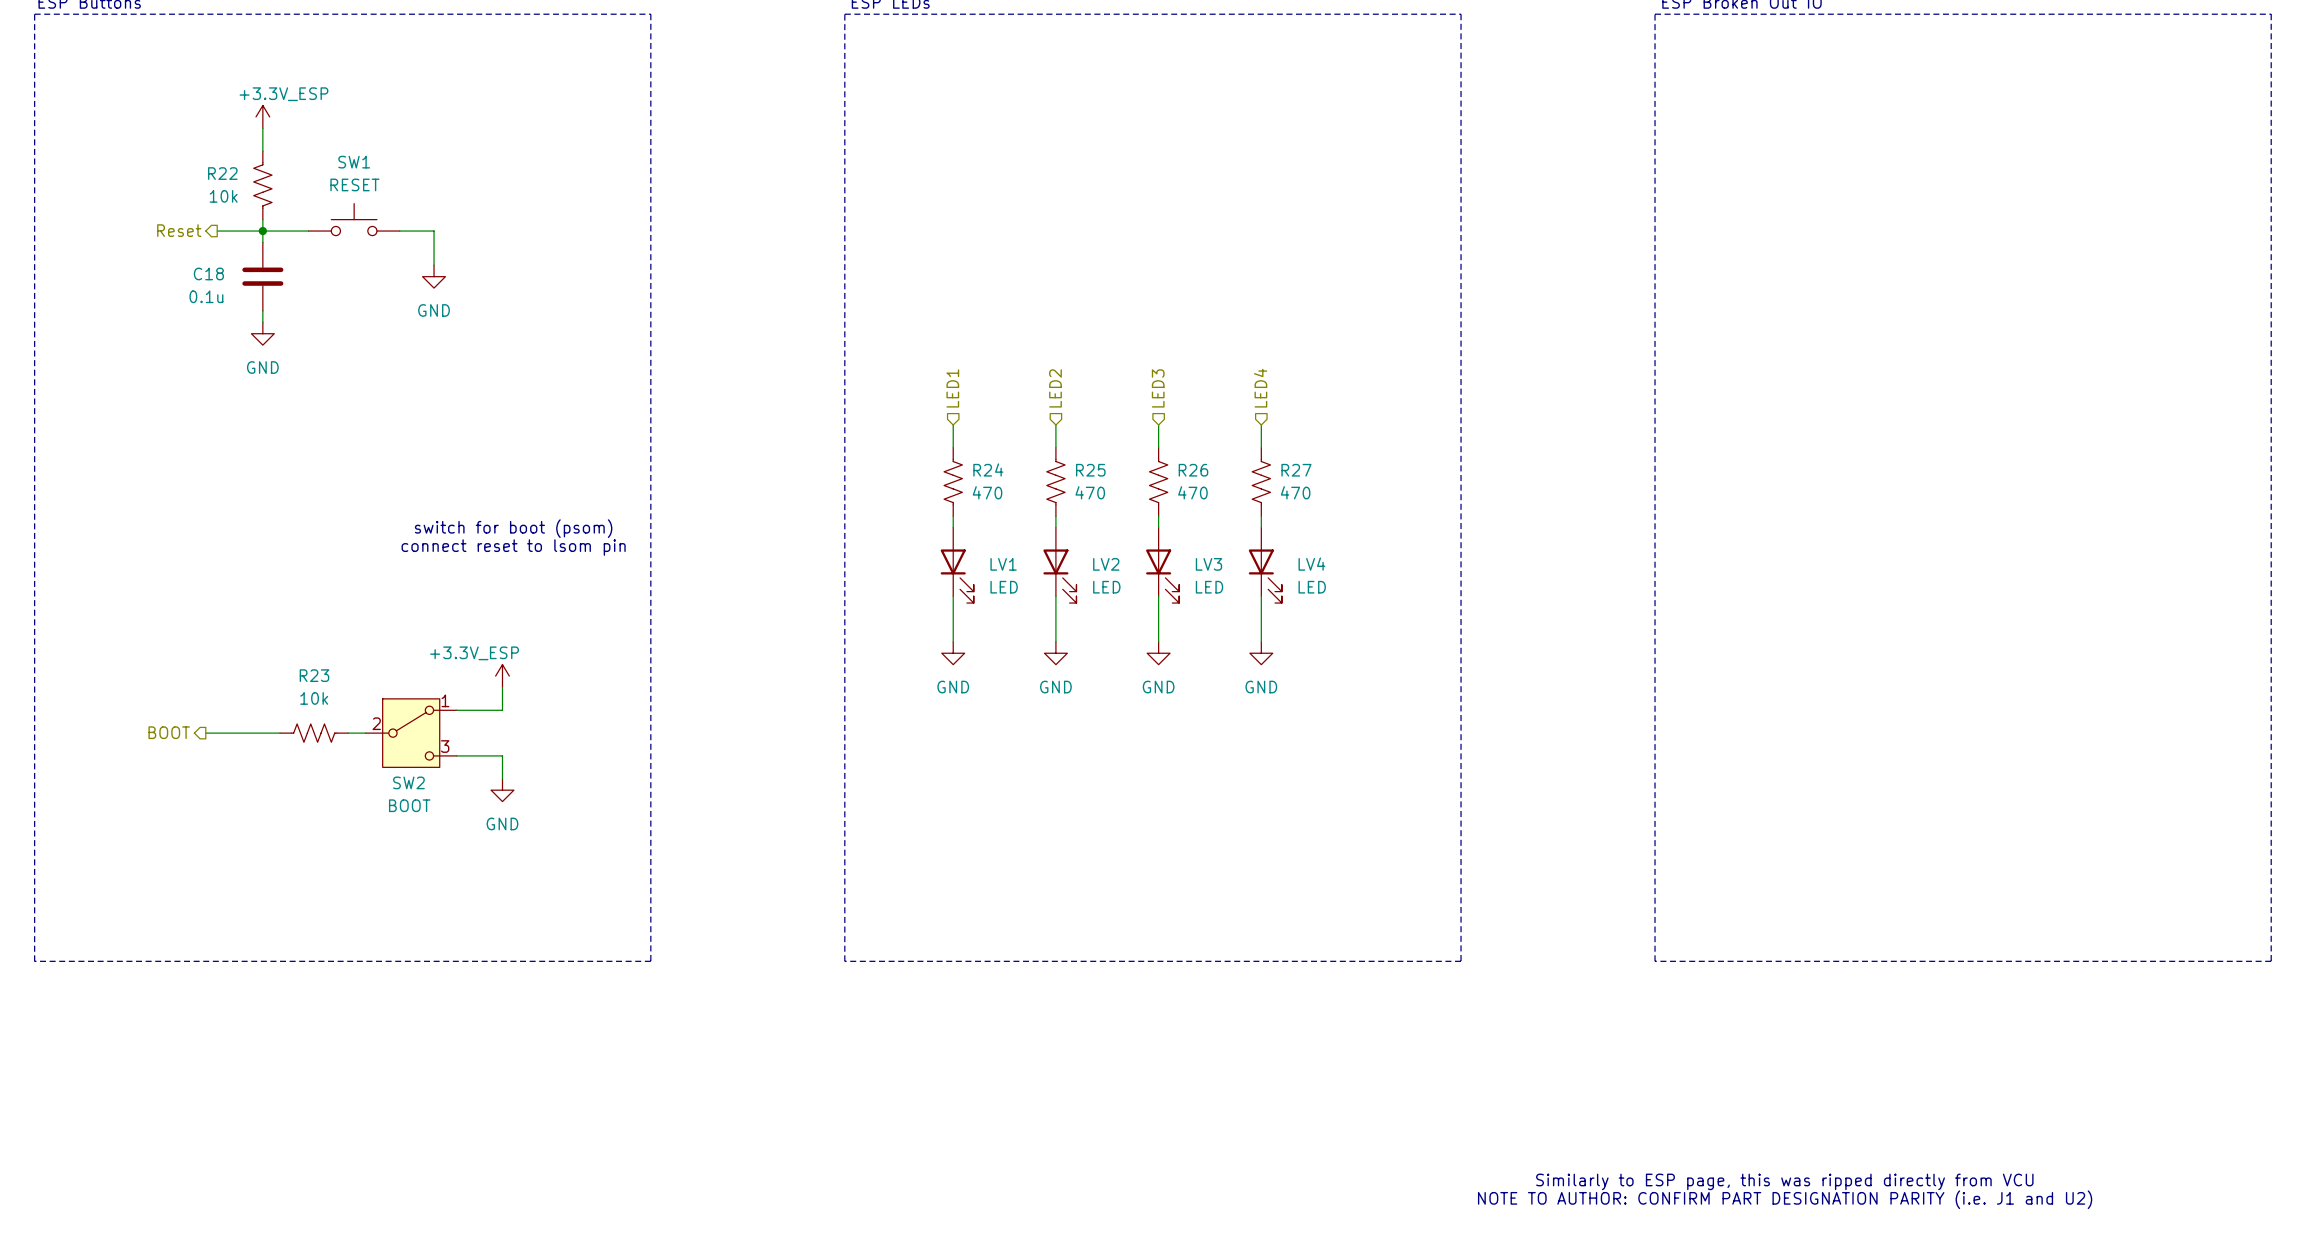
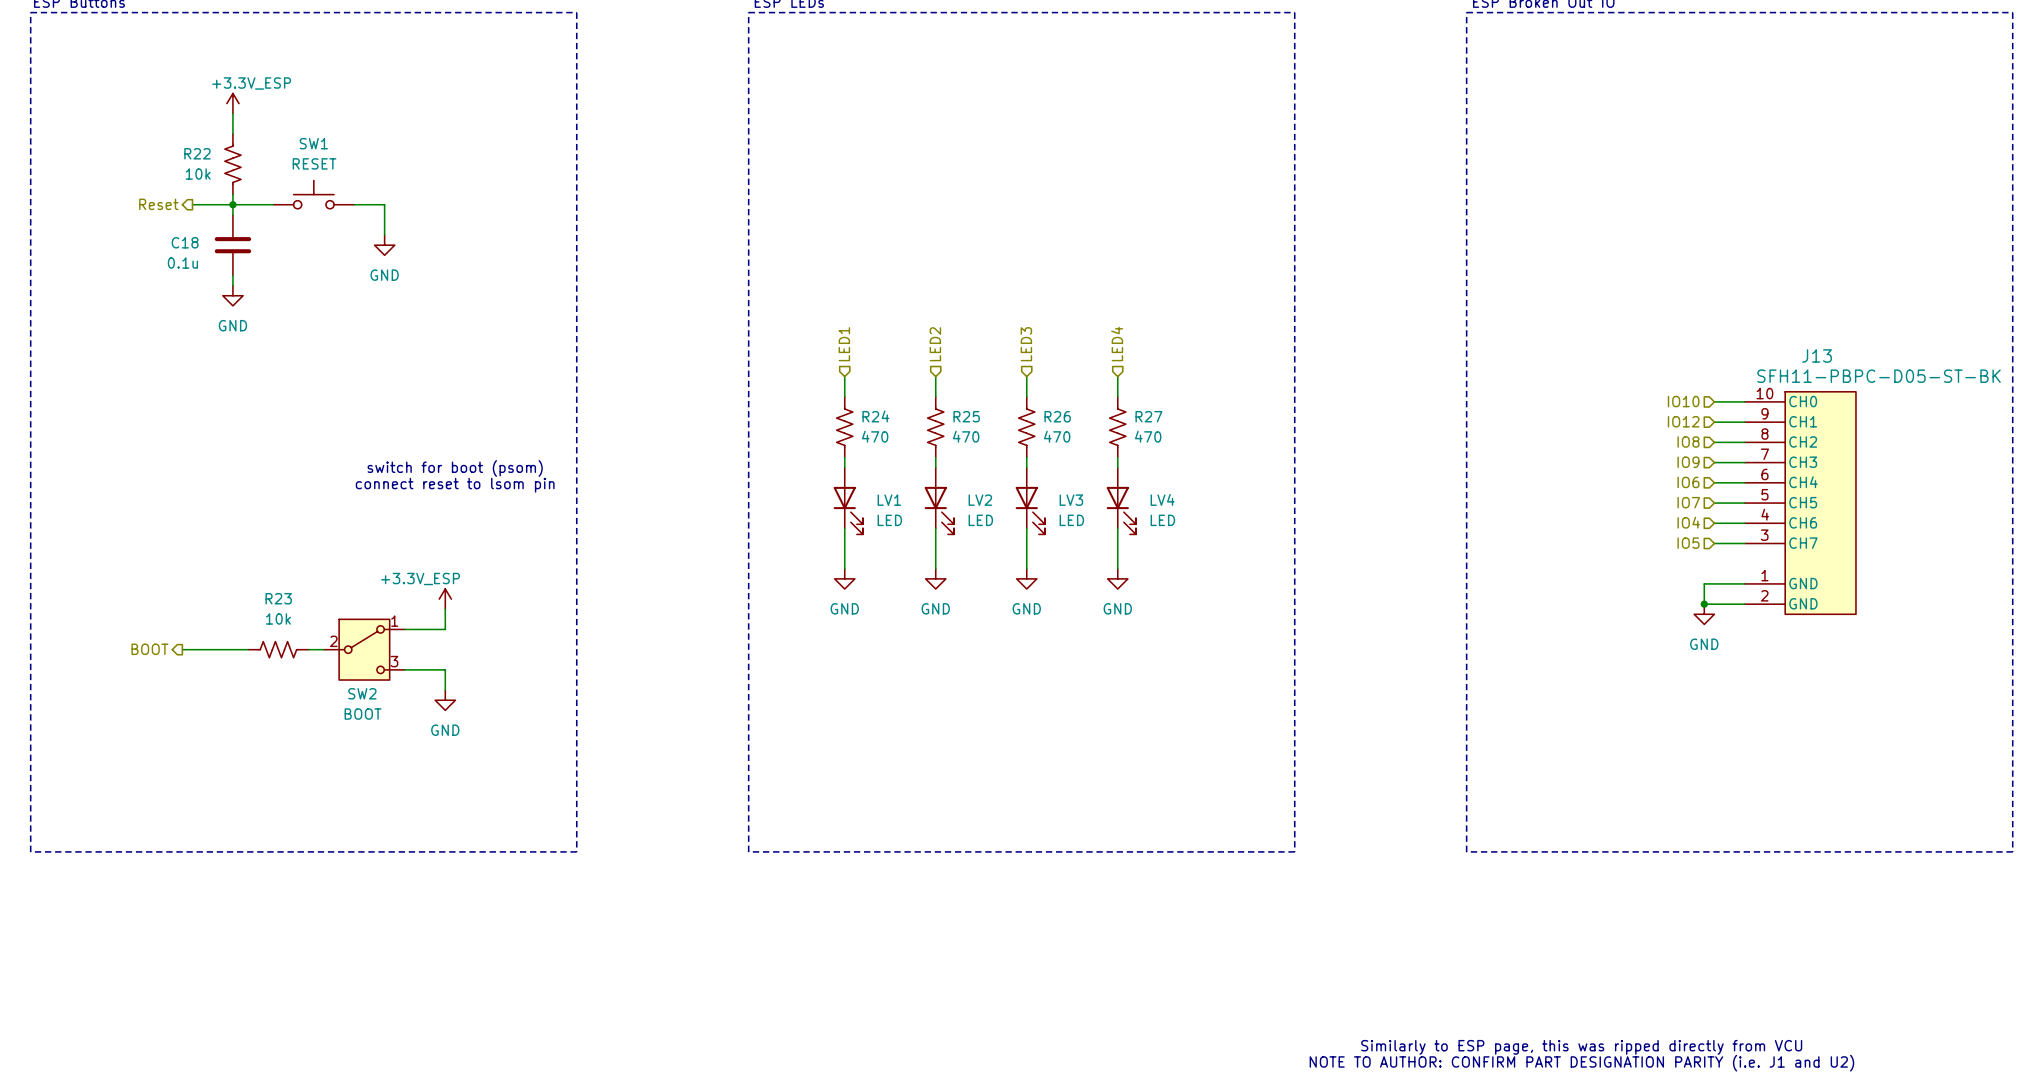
hierarchical label: none -> IO10 (1683, 401)
wire: none -> (1714, 401) (1744, 401)
hierarchical label: none -> IO12 (1683, 421)
wire: none -> (1714, 422) (1744, 422)
hierarchical label: none -> IO8 (1688, 442)
wire: none -> (1714, 442) (1744, 442)
hierarchical label: none -> IO9 (1688, 462)
wire: none -> (1714, 462) (1744, 462)
hierarchical label: none -> IO6 (1688, 482)
wire: none -> (1714, 482) (1744, 482)
hierarchical label: none -> IO7 (1688, 502)
wire: none -> (1714, 503) (1744, 503)
J13: none -> SFH11-PBPC-D05-ST-BK (1800, 503)
hierarchical label: none -> IO4 (1688, 522)
wire: none -> (1714, 523) (1744, 523)
hierarchical label: none -> IO5 (1688, 543)
wire: none -> (1714, 543) (1744, 543)
wire: none -> (1744, 583) (1704, 583) (1704, 604) (1744, 604)
junction: none -> (1704, 604)
power symbol: none -> GND (1704, 614)

